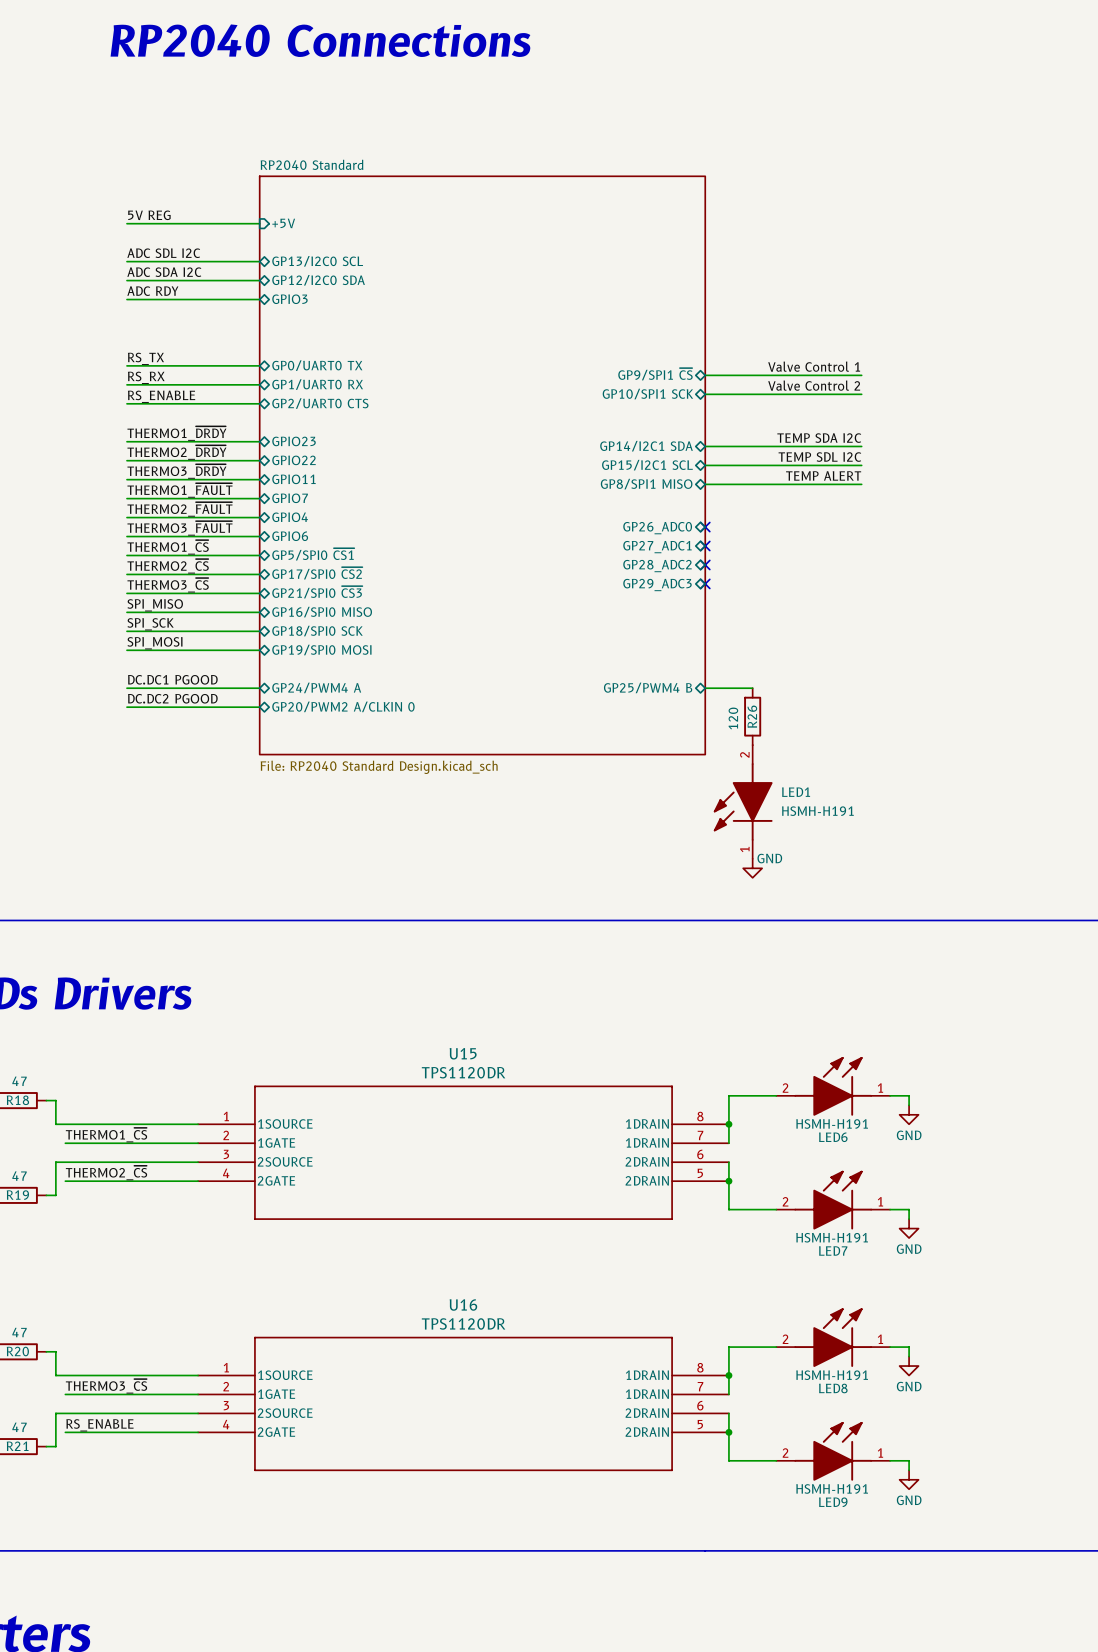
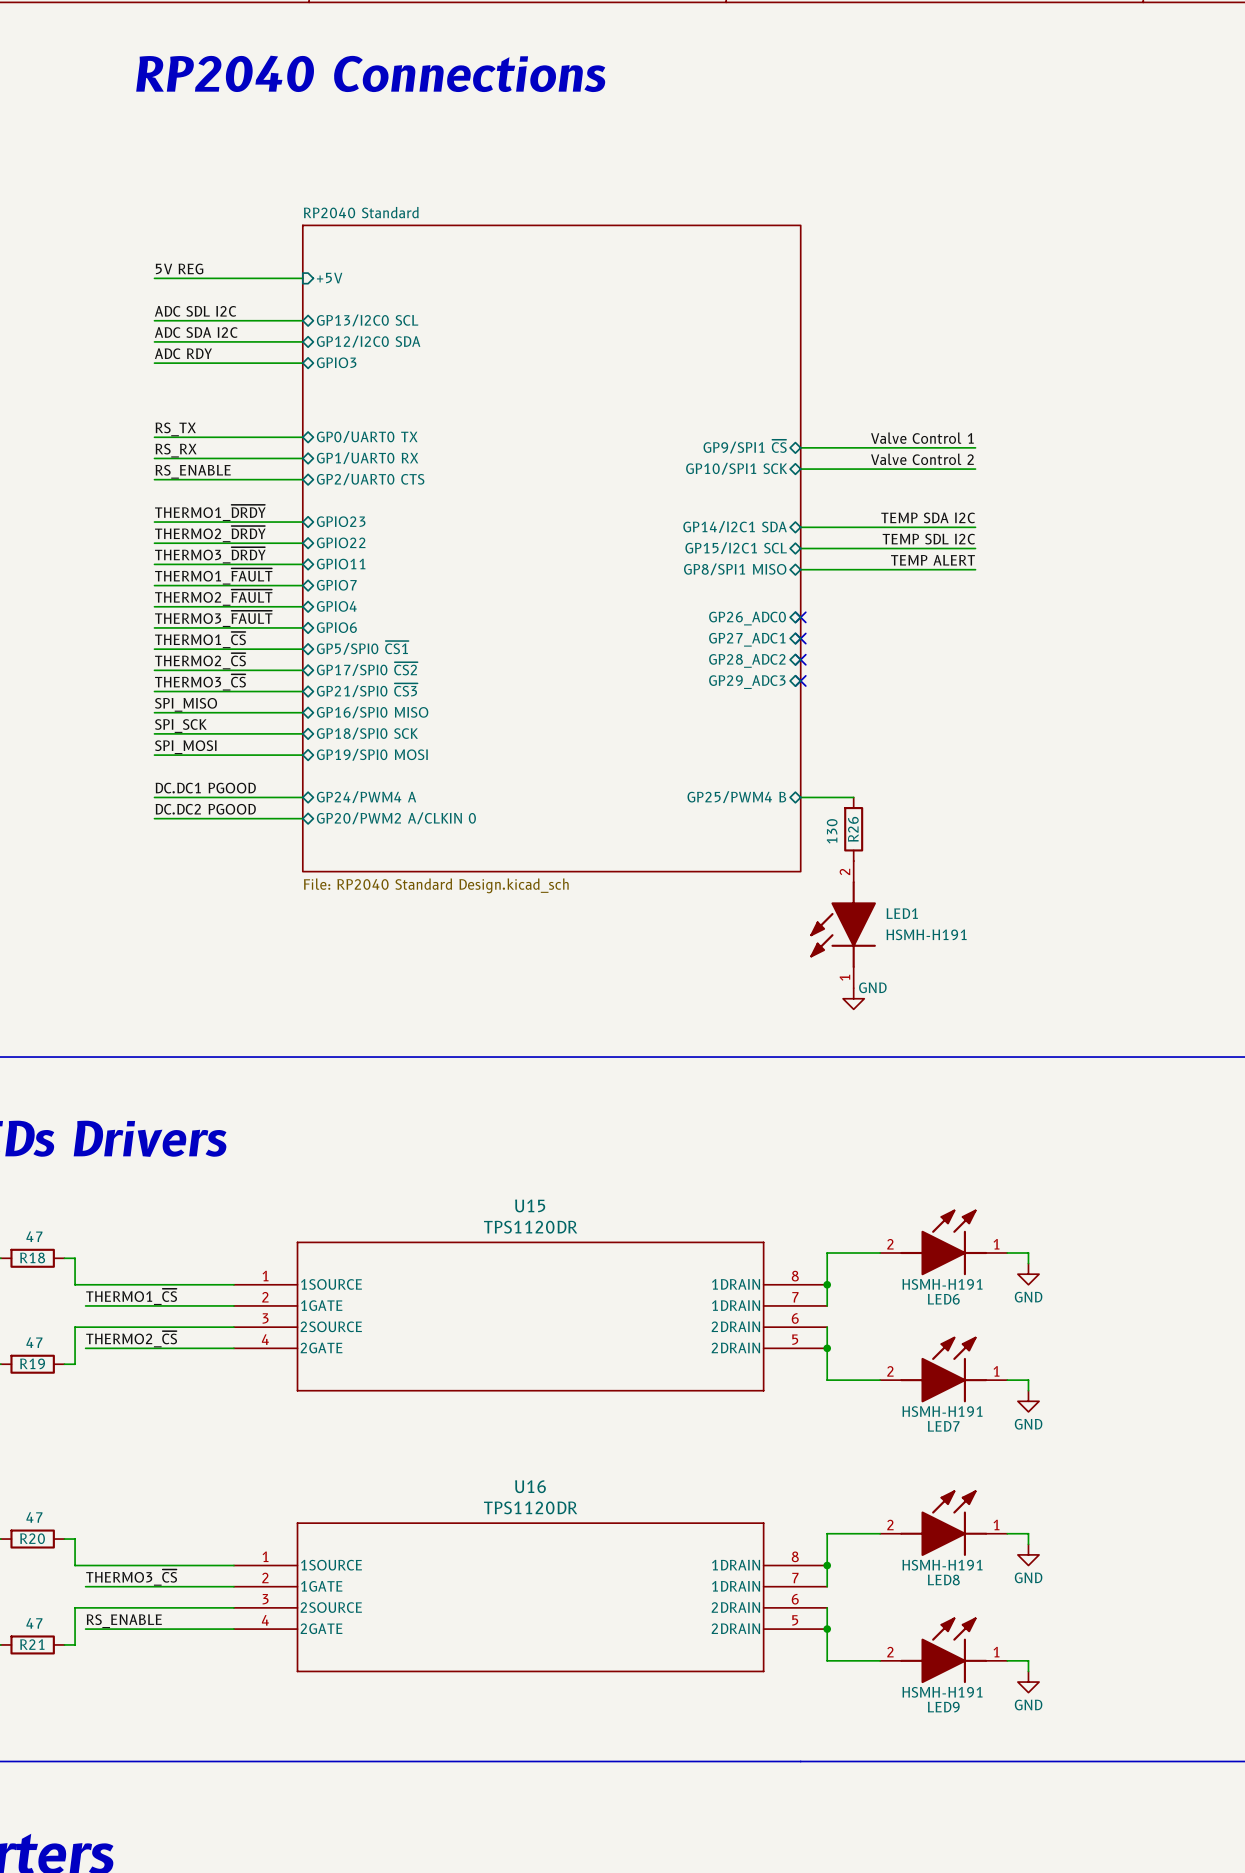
R26 value: 120 (733, 718) -> 130 (832, 831)

